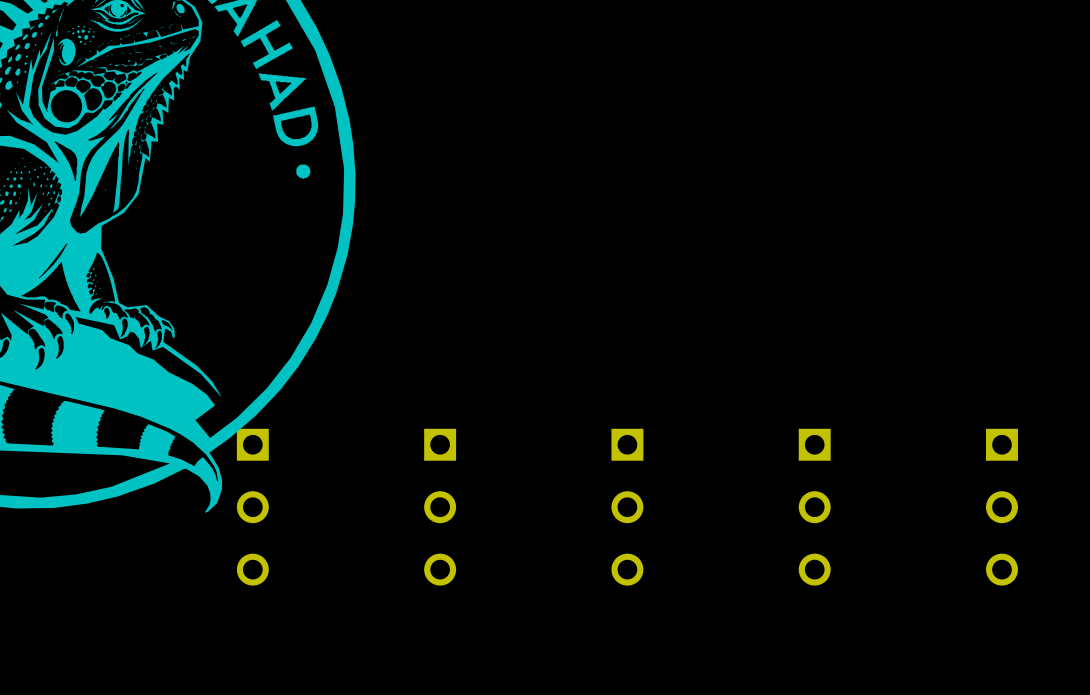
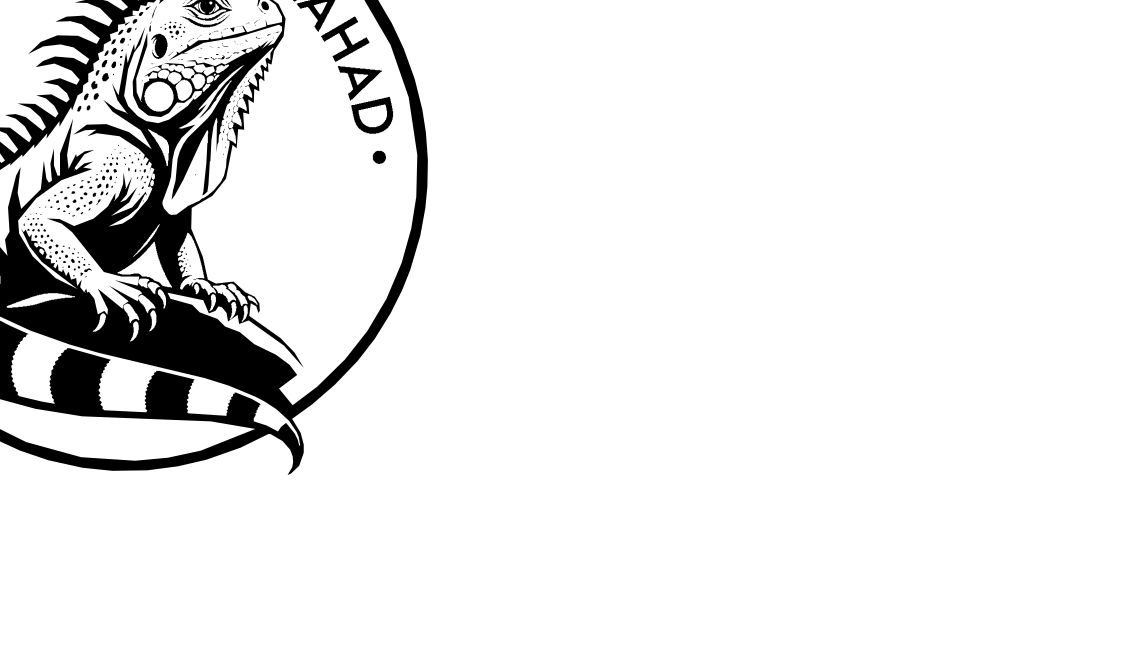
part: (252, 507) -> none
part: (440, 507) -> none
part: (627, 507) -> none
part: (814, 507) -> none
part: (1002, 507) -> none

